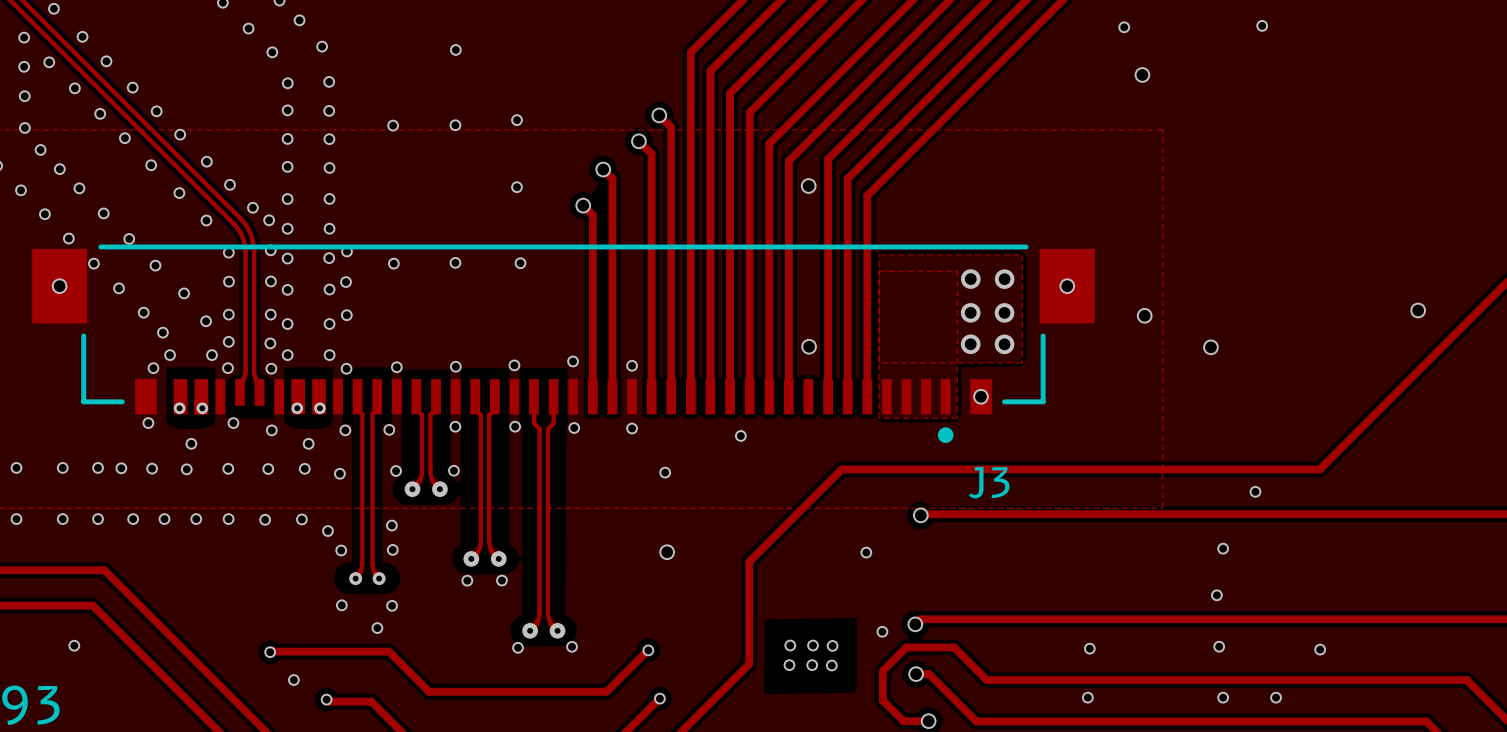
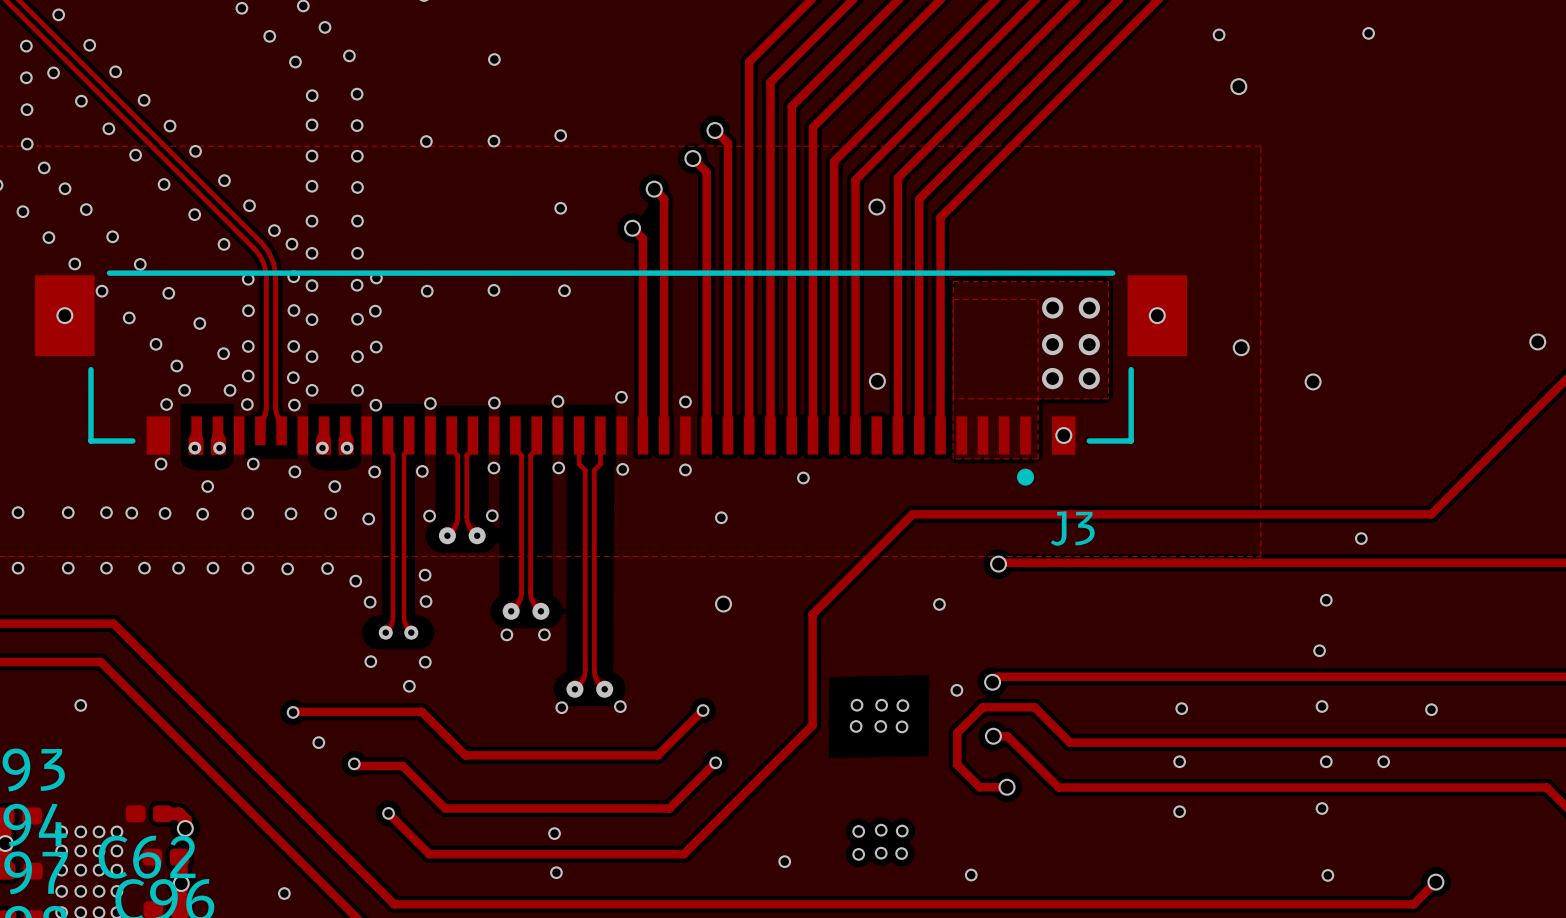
J3 footprint: [32, 244, 1095, 444] -> [35, 270, 1188, 486]

